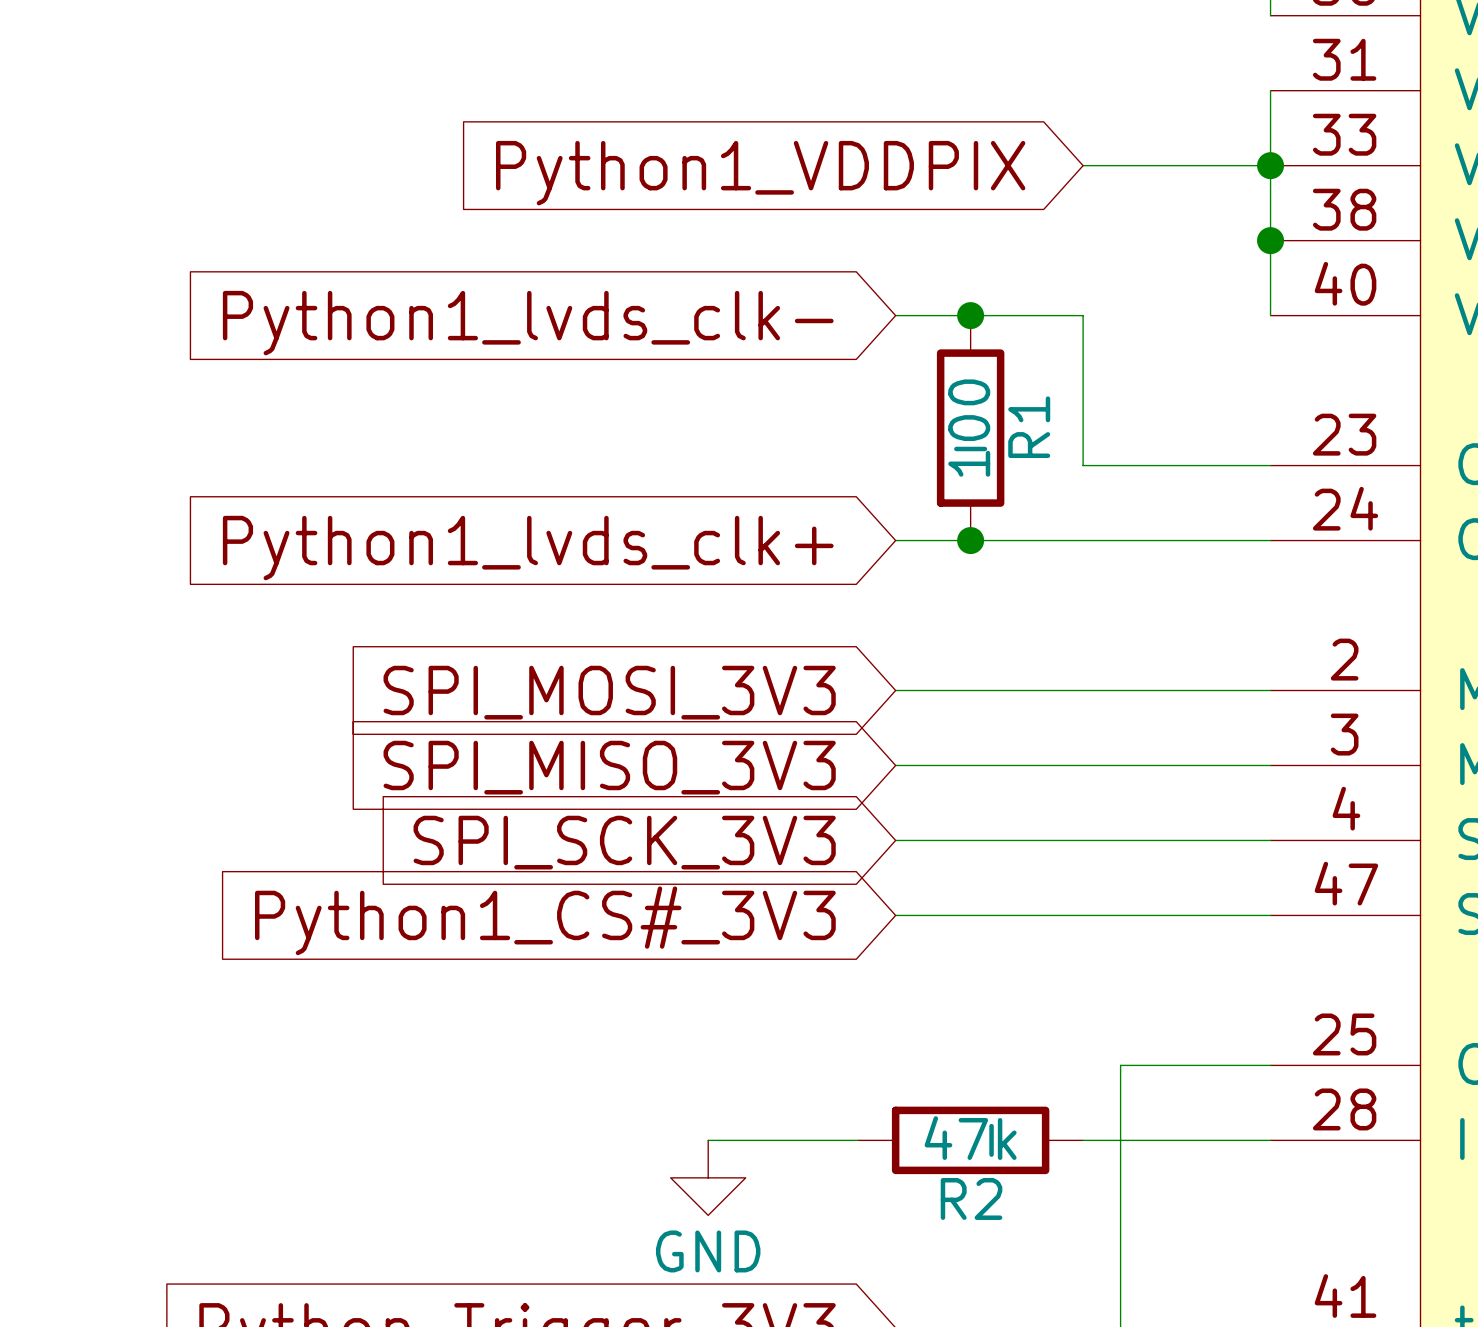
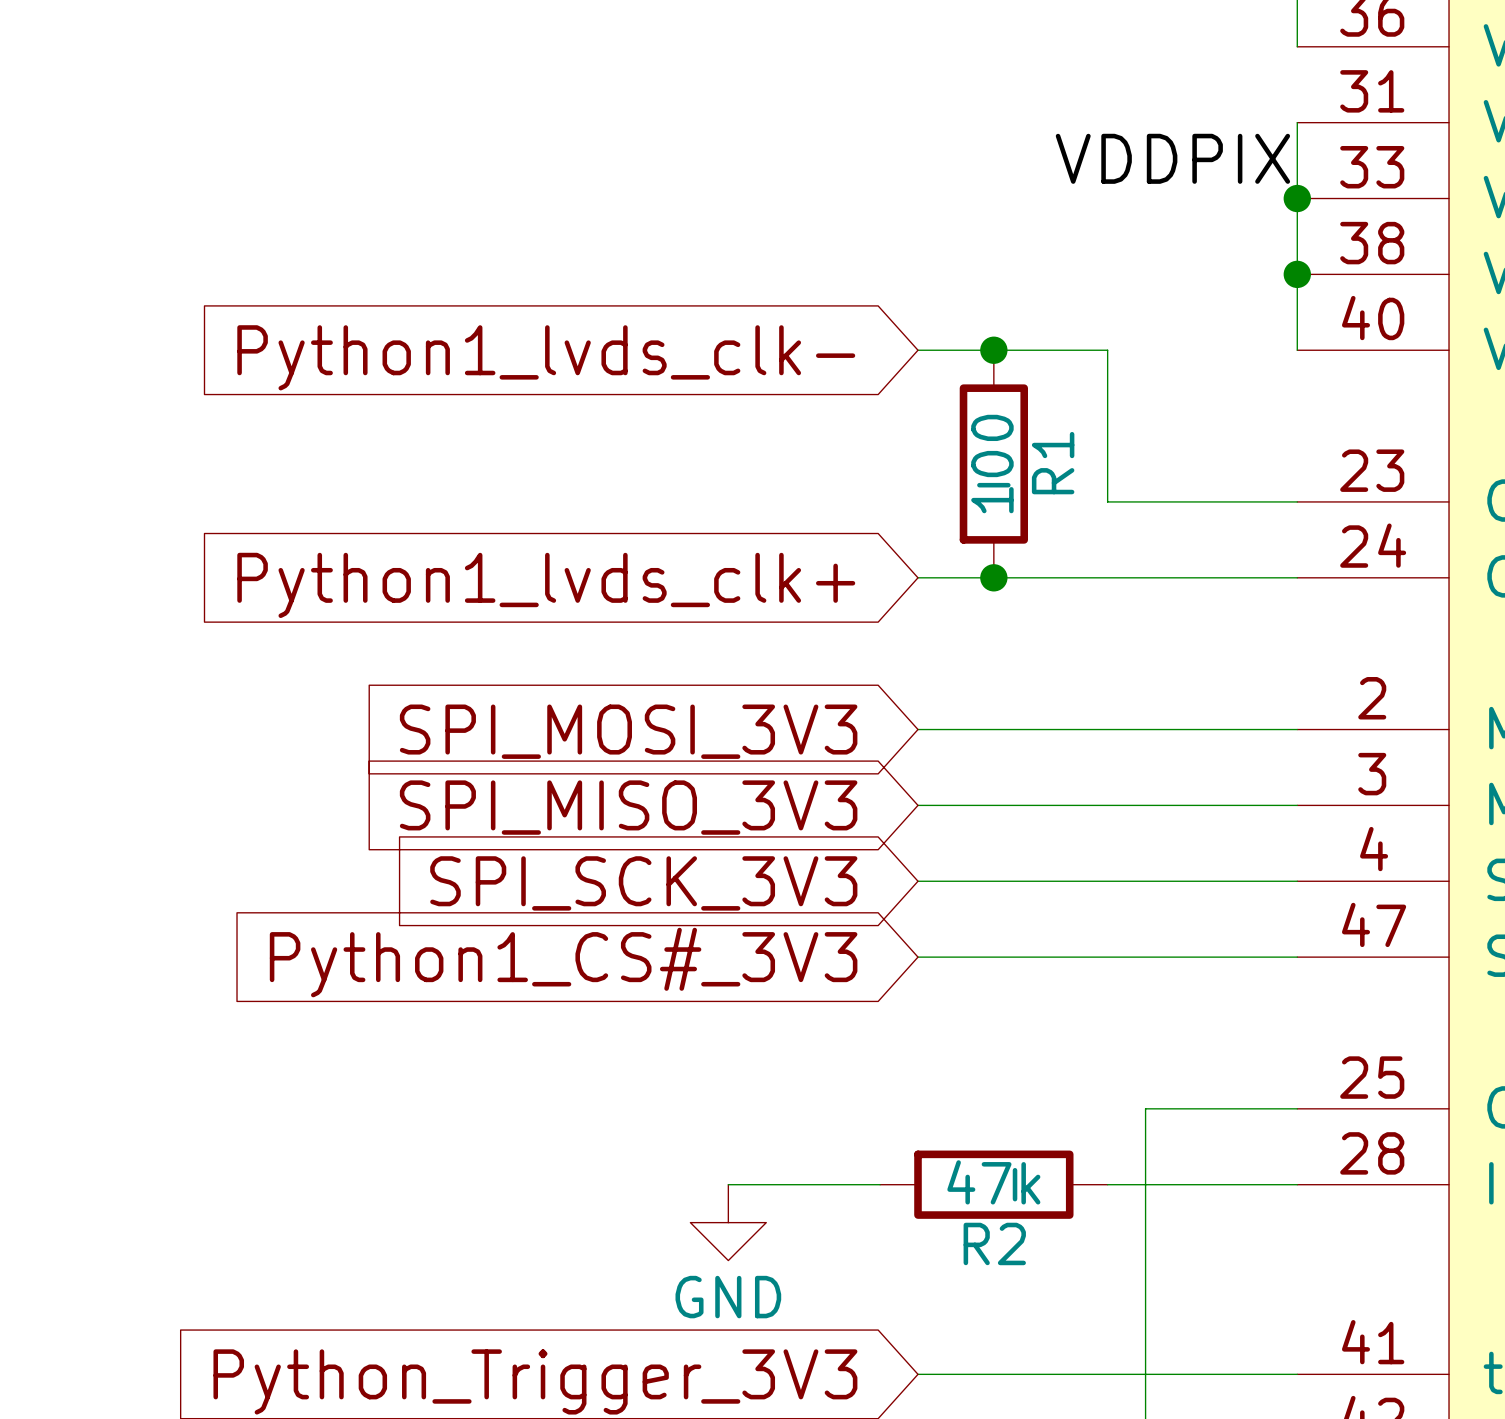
label: none -> VDDPIX (1172, 158)
wire: (1083, 165) (1270, 165) -> none
global label: Python1_VDDPIX (760, 173) -> none

